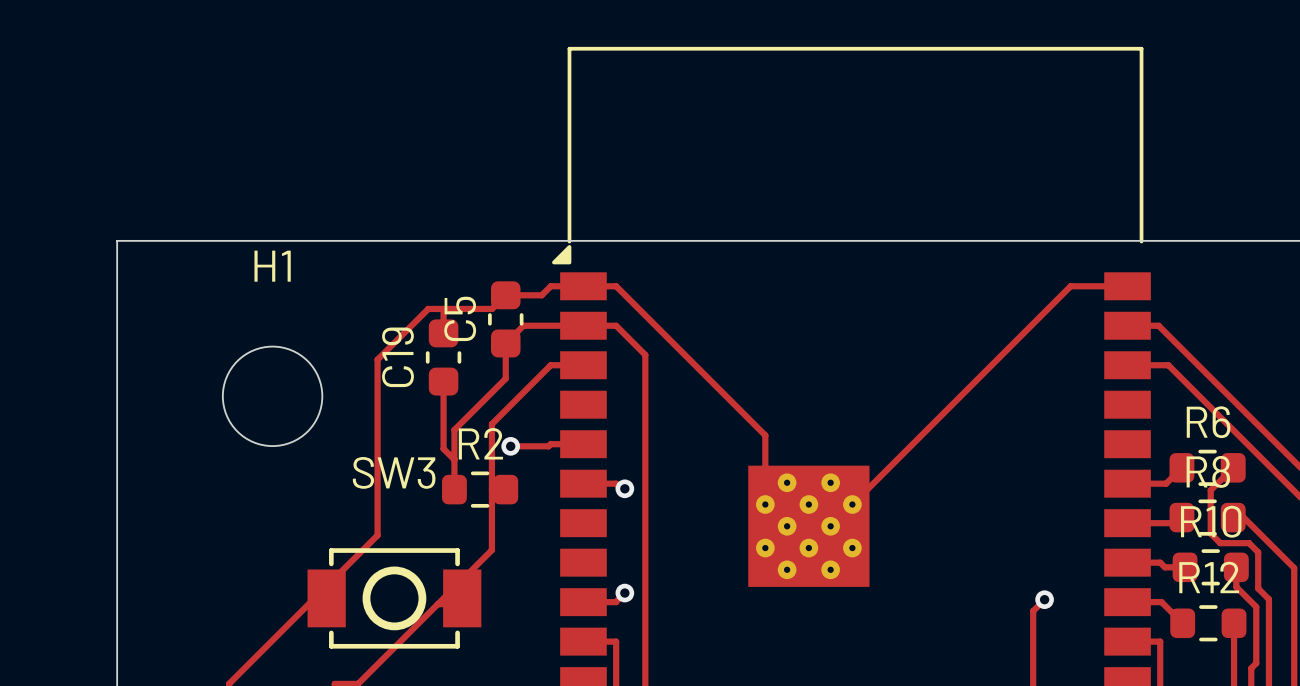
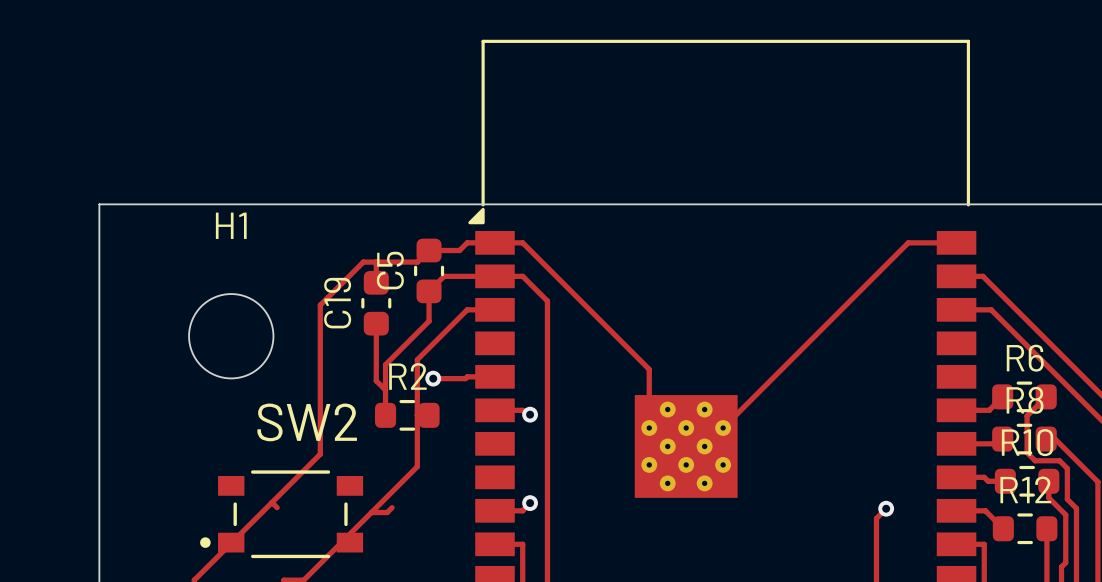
SW3: (394, 598) -> none
SW2: none -> (281, 514)

